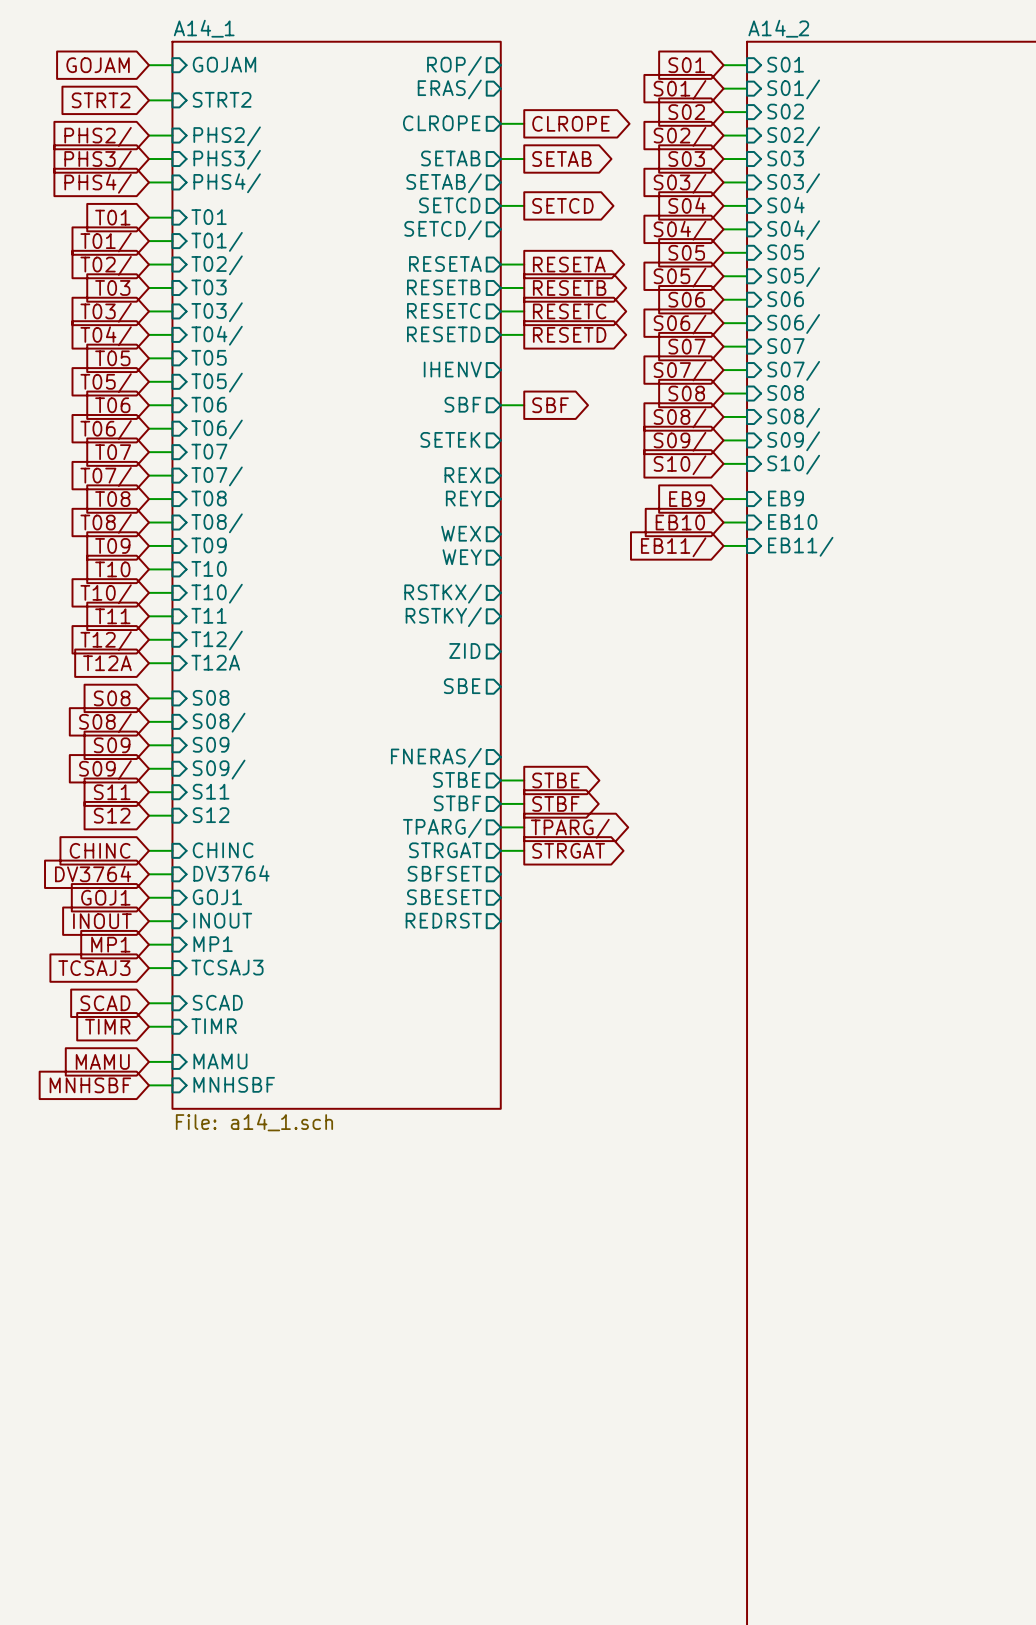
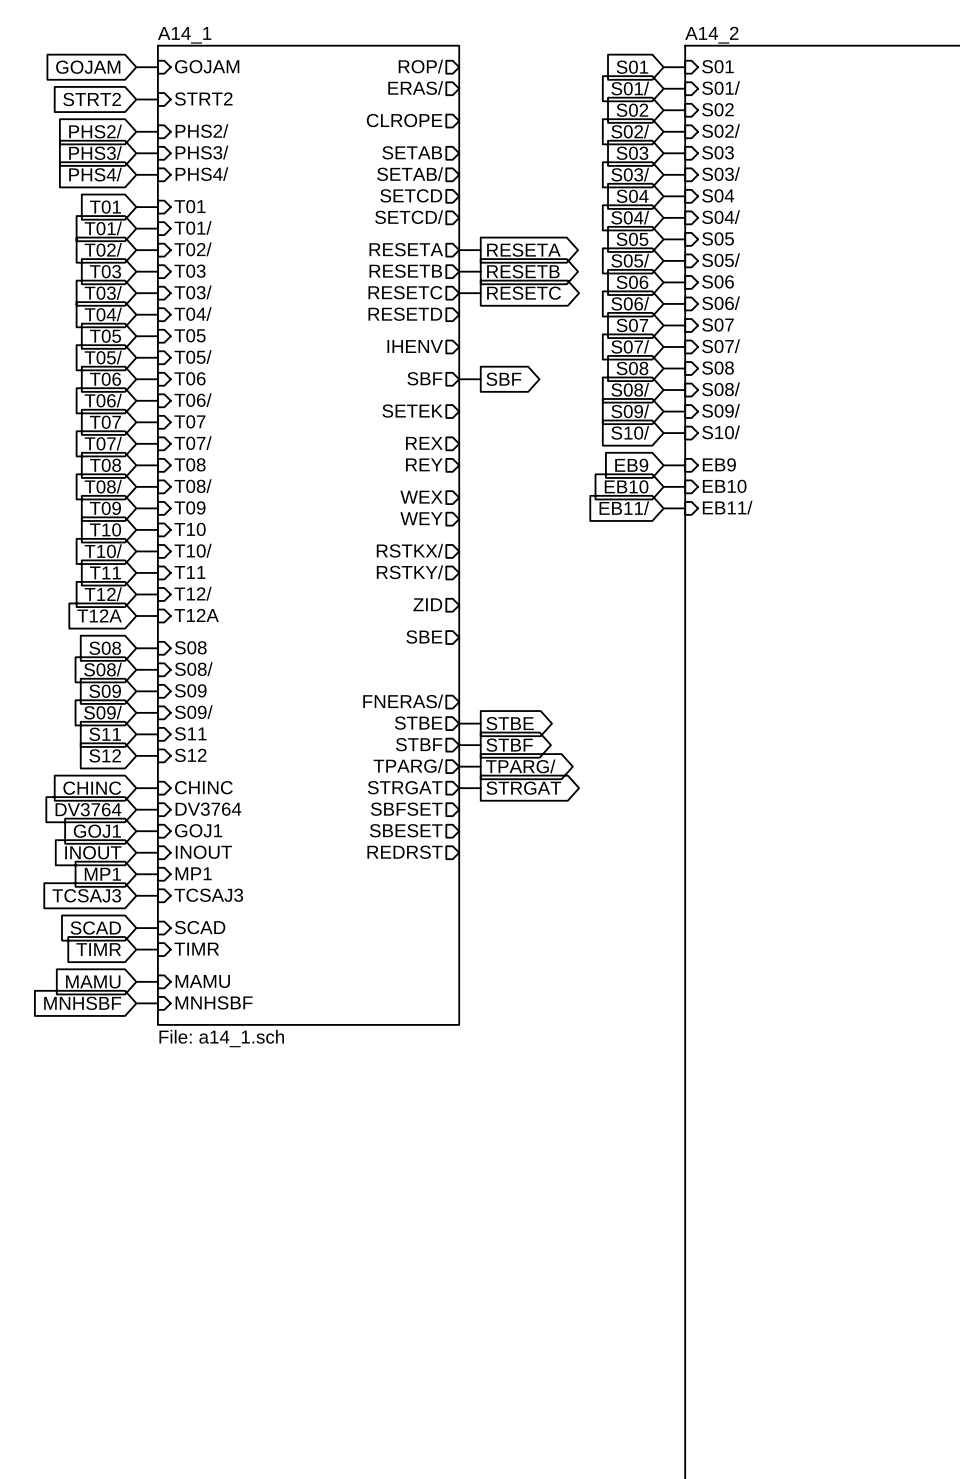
wire: (500, 123) (524, 123) -> none
global label: CLROPE (570, 123) -> none
wire: (500, 159) (524, 159) -> none
global label: SETAB (561, 159) -> none
wire: (500, 205) (524, 205) -> none
global label: SETCD (562, 205) -> none
wire: (500, 334) (524, 334) -> none
global label: RESETD (569, 334) -> none

